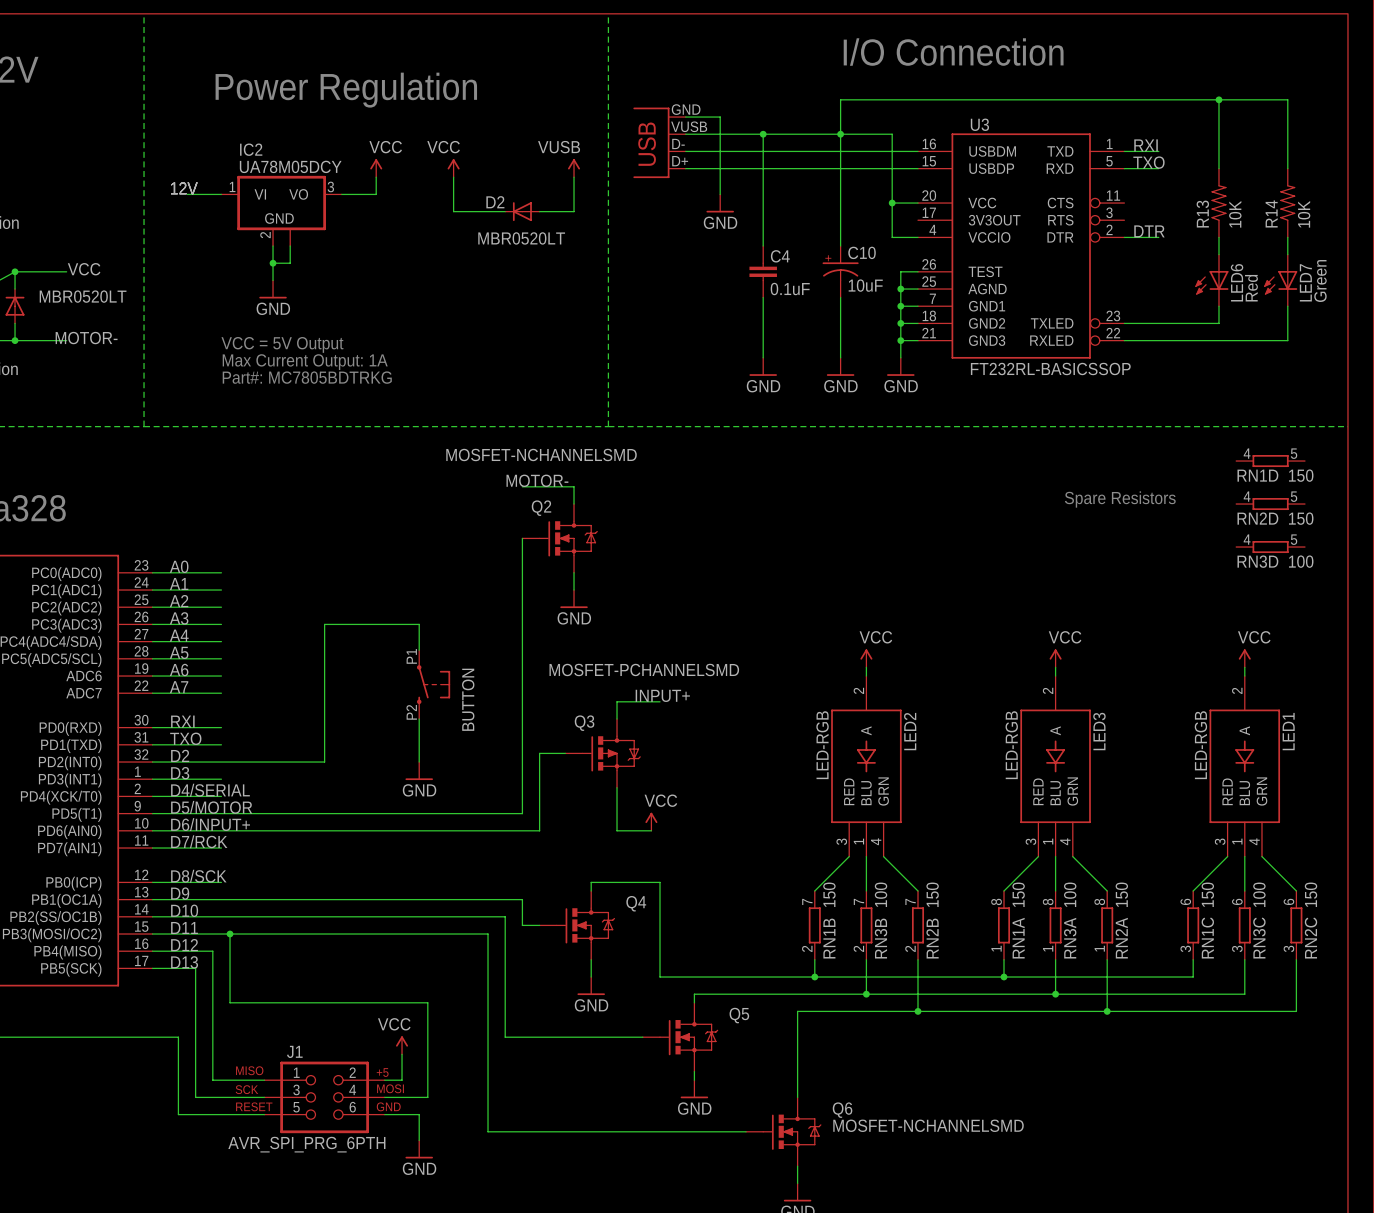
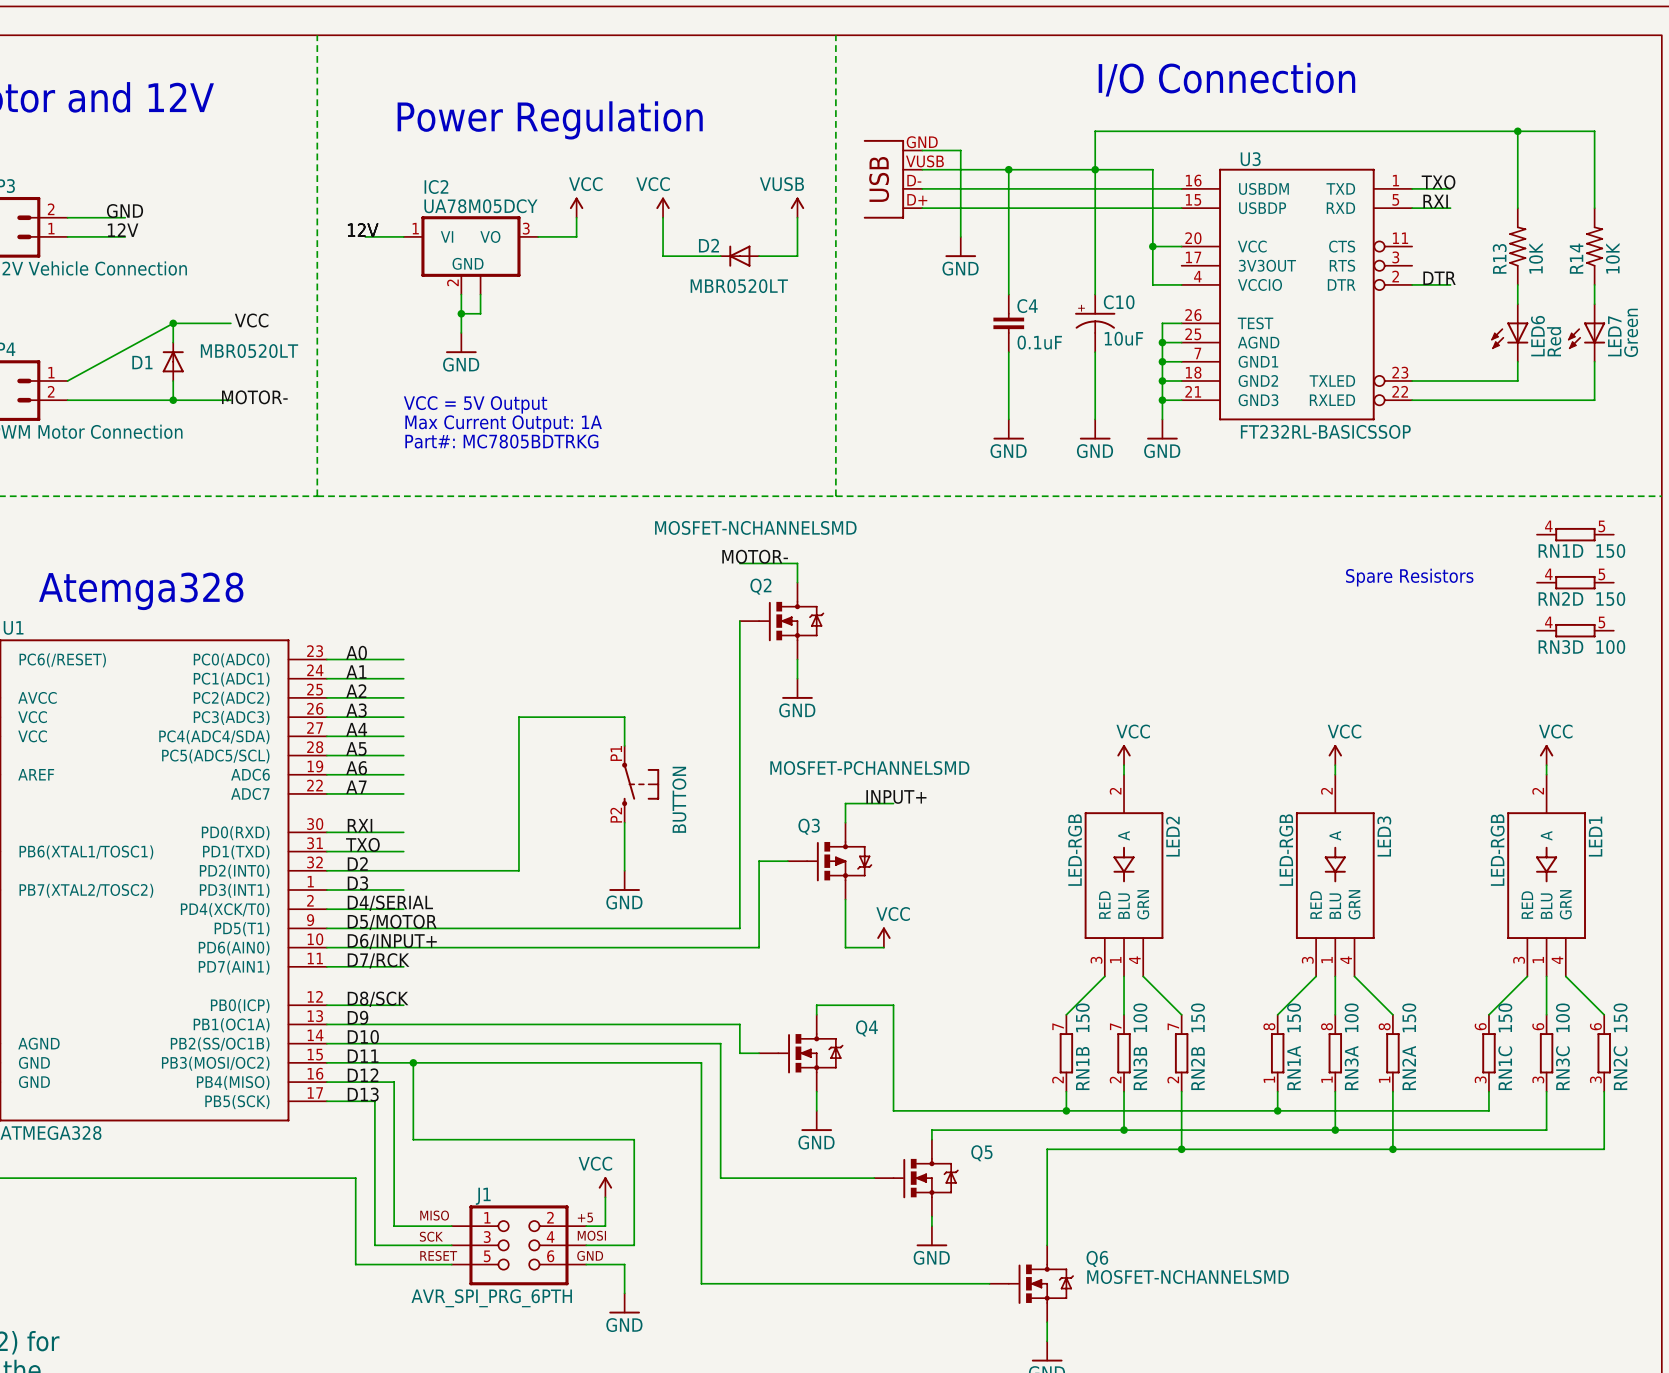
label: RXI (1146, 145) -> TXO (1438, 182)
label: TXO (1148, 162) -> RXI (1435, 201)

